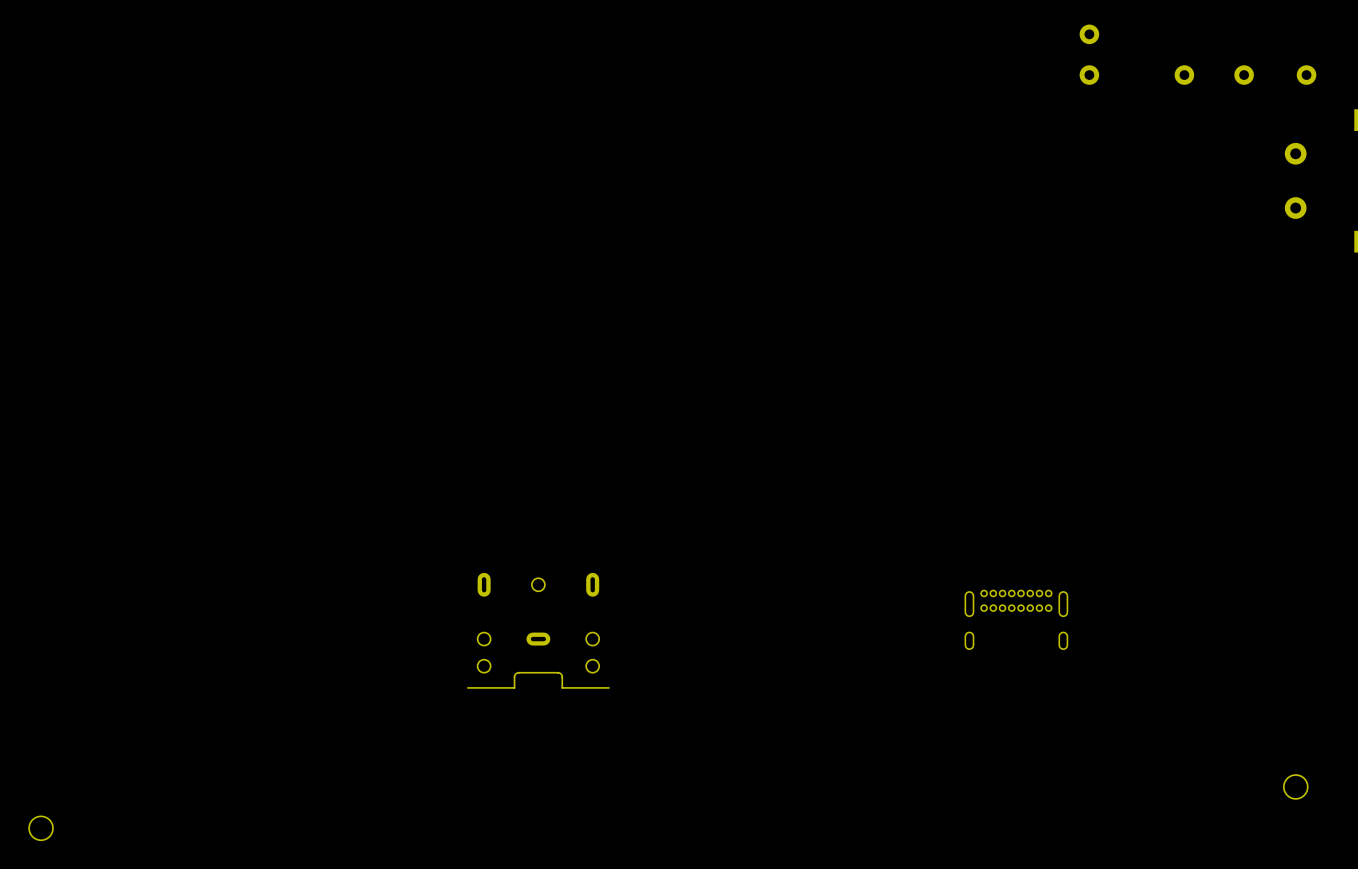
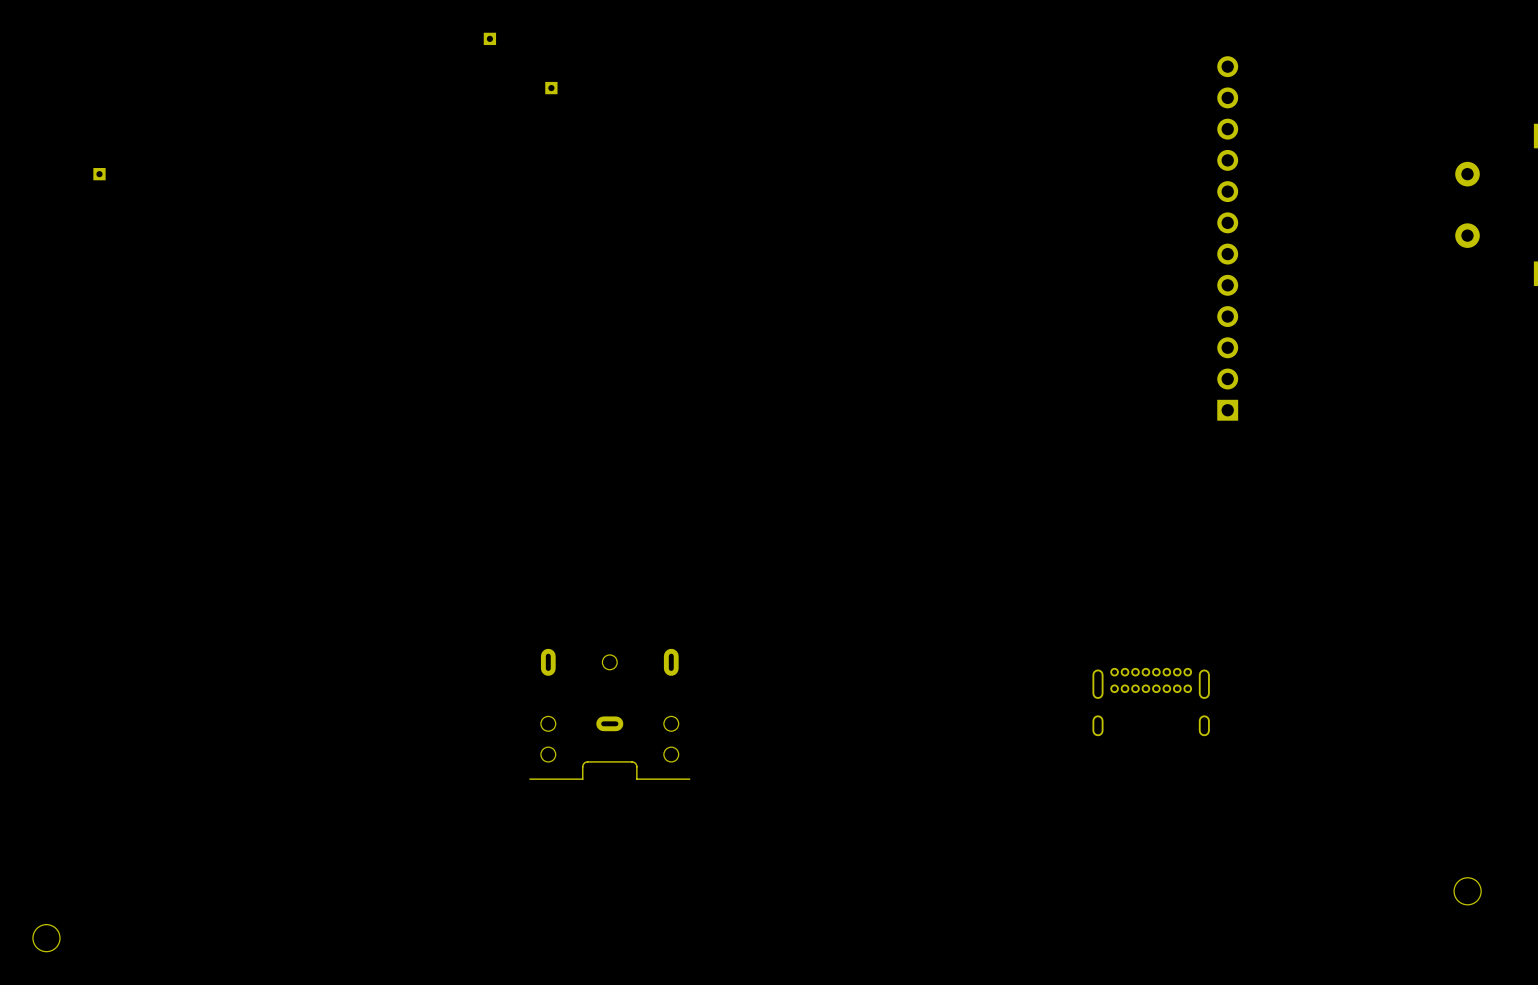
part: none -> (489, 38)
part: (1089, 34) -> none
part: (1089, 75) -> none
part: (1184, 75) -> none
part: (1244, 75) -> none
part: (1306, 75) -> none
part: none -> (551, 88)
part: none -> (99, 174)
part: none -> (1227, 238)

